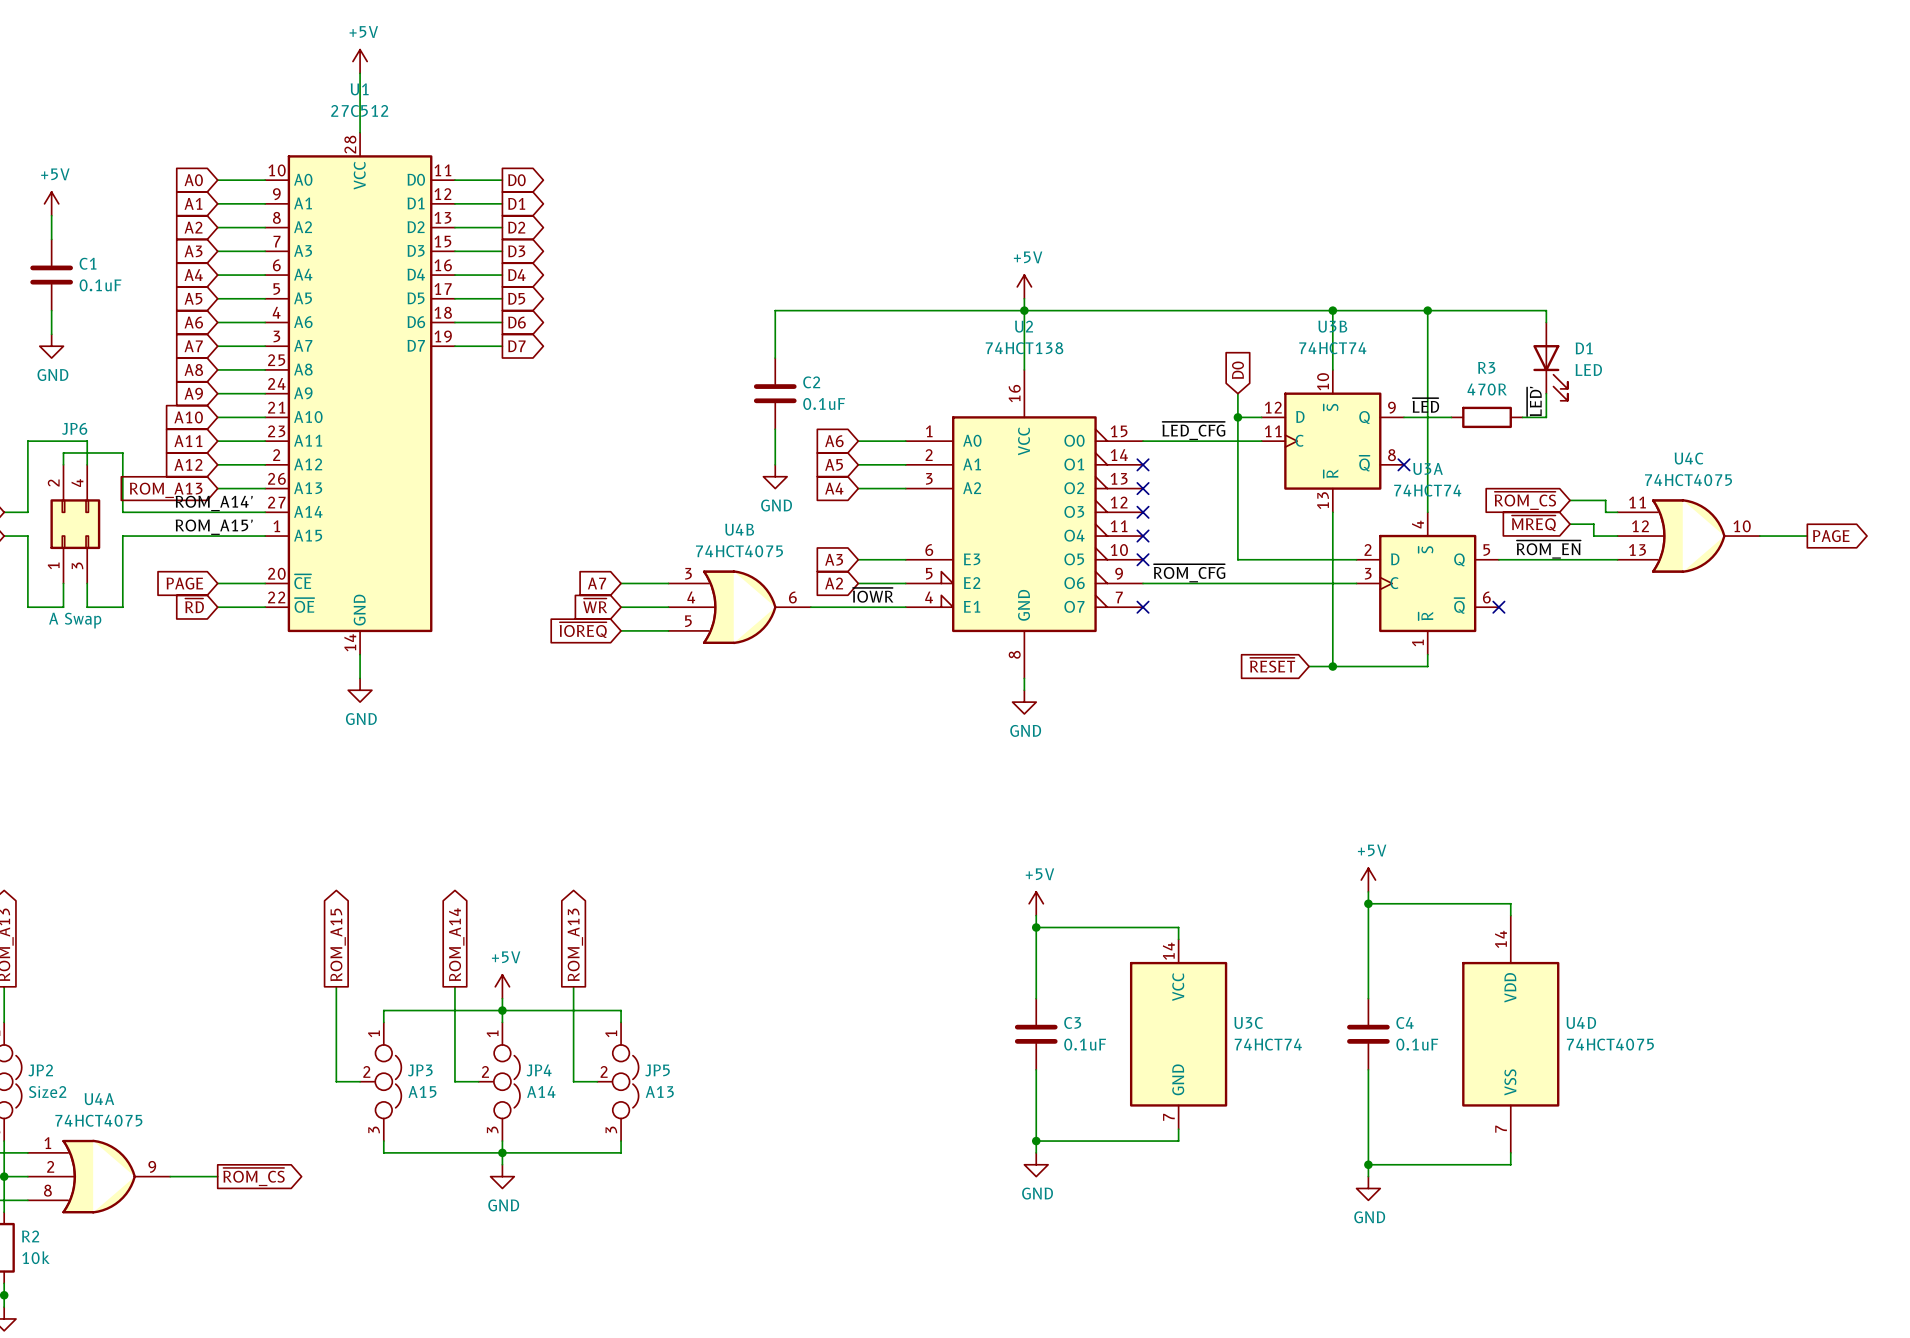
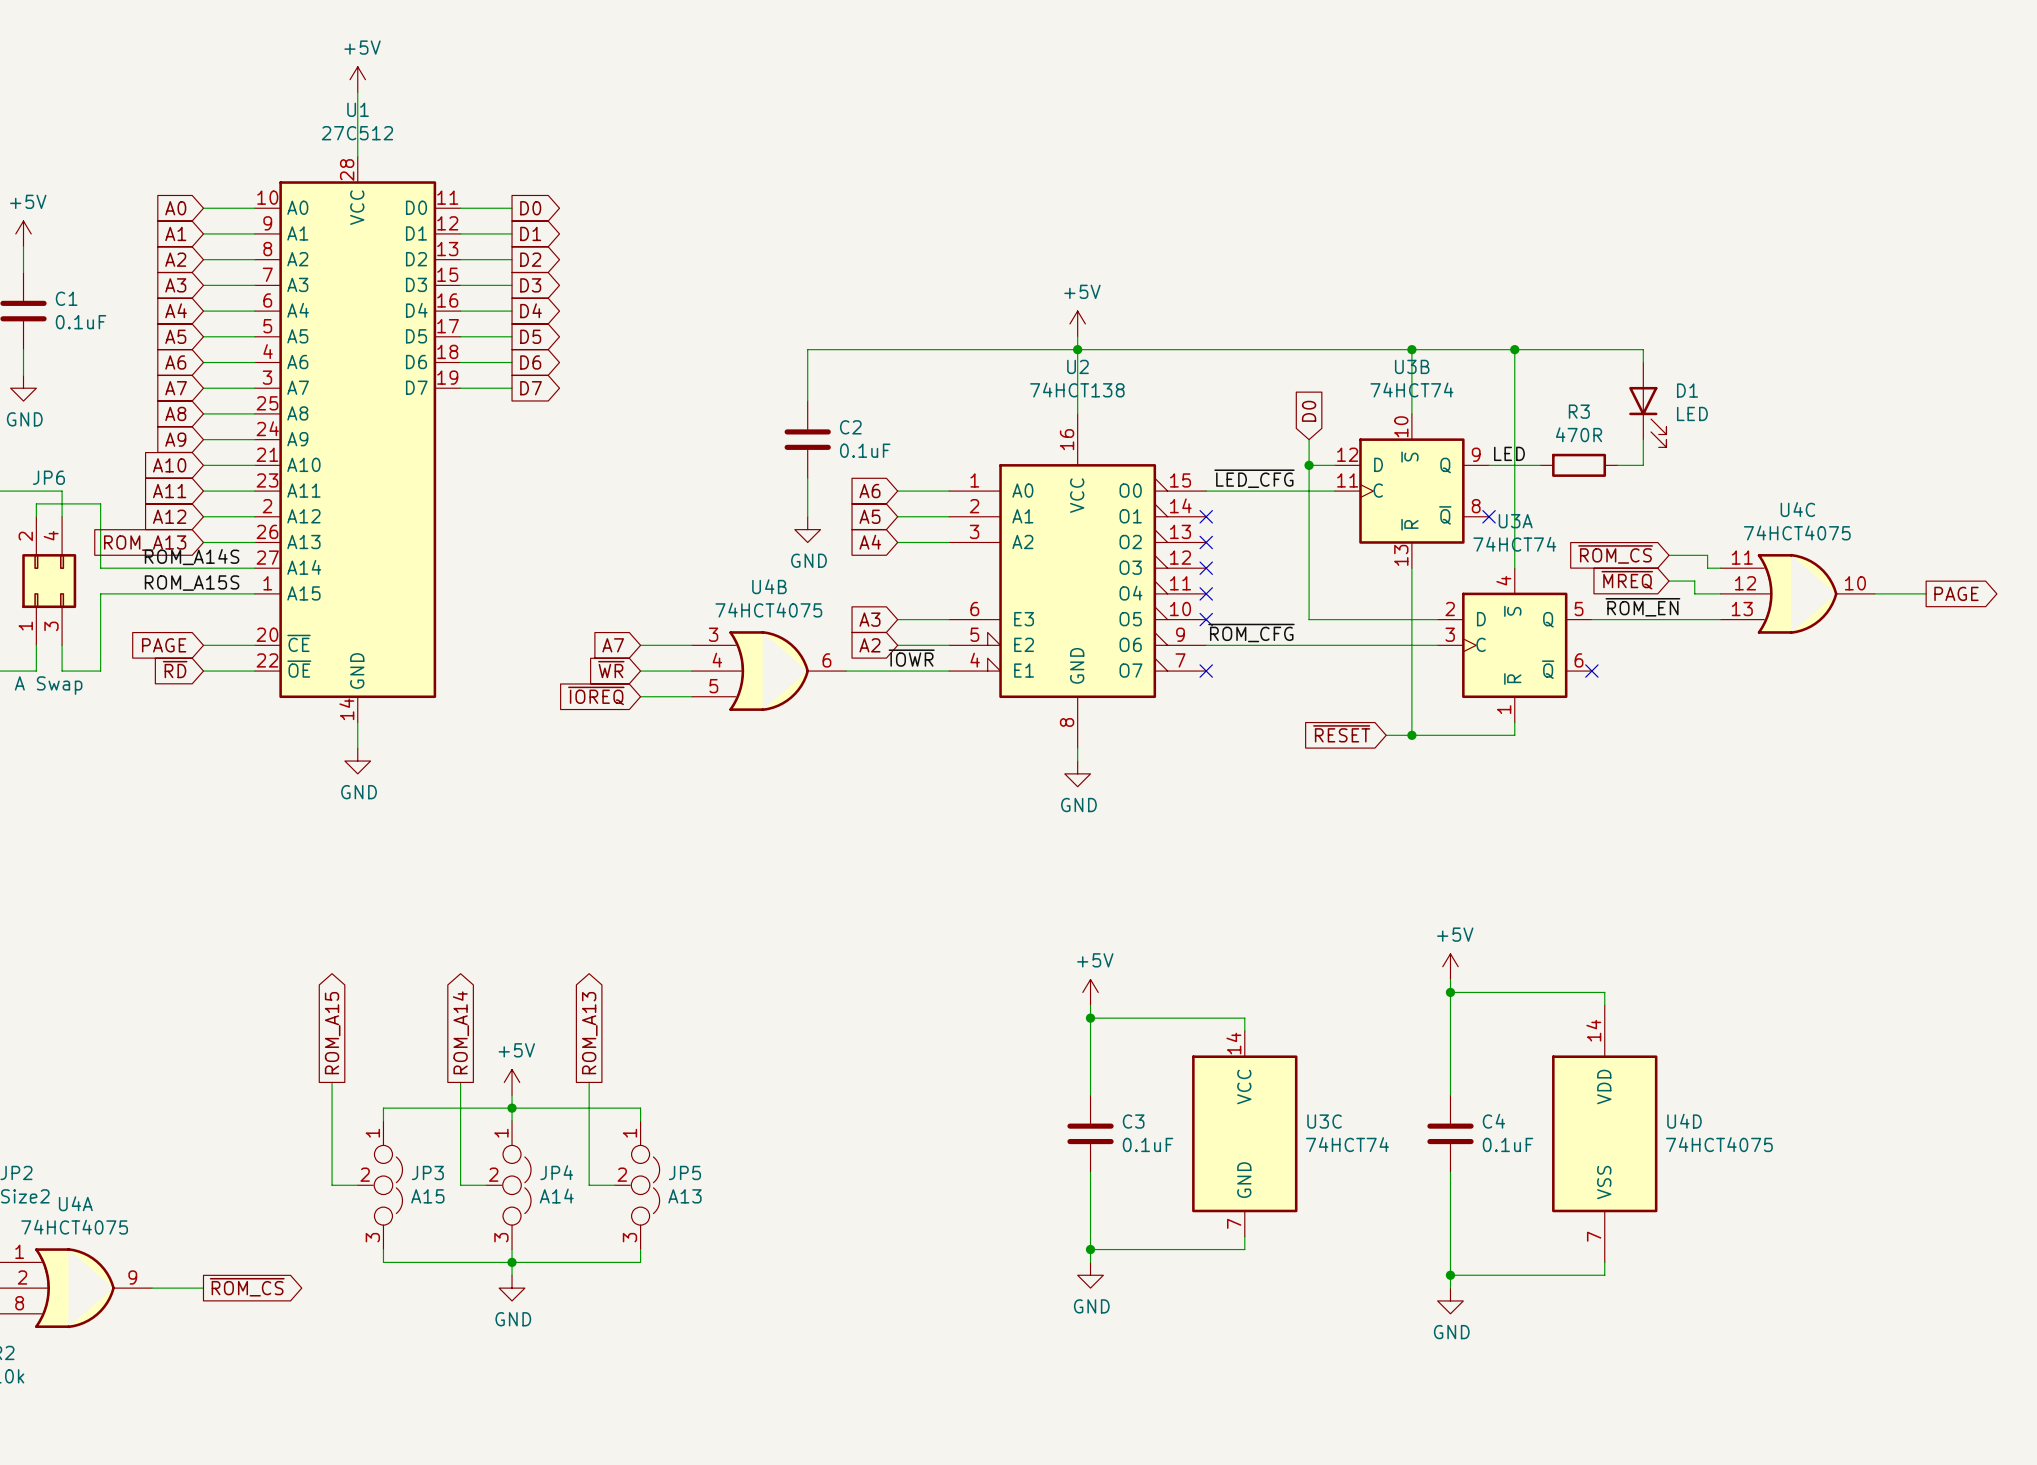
label: ~{LED'} (1534, 401) -> none
label: ~{LED} (1425, 405) -> LED (1509, 453)
label: ROM_A14' (214, 503) -> ROM_A14S (192, 557)
label: ROM_A15' (214, 527) -> ROM_A15S (192, 583)

